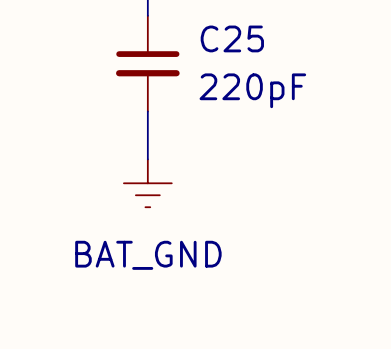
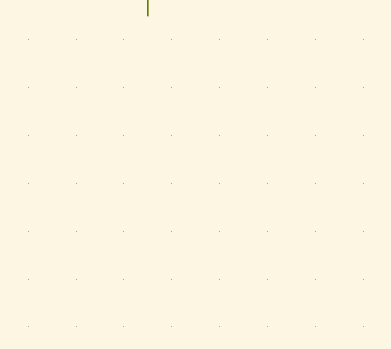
C25: 220pF (147, 63) -> none
wire: (147, 111) (147, 159) -> none
power symbol: BAT_GND (147, 183) -> none

